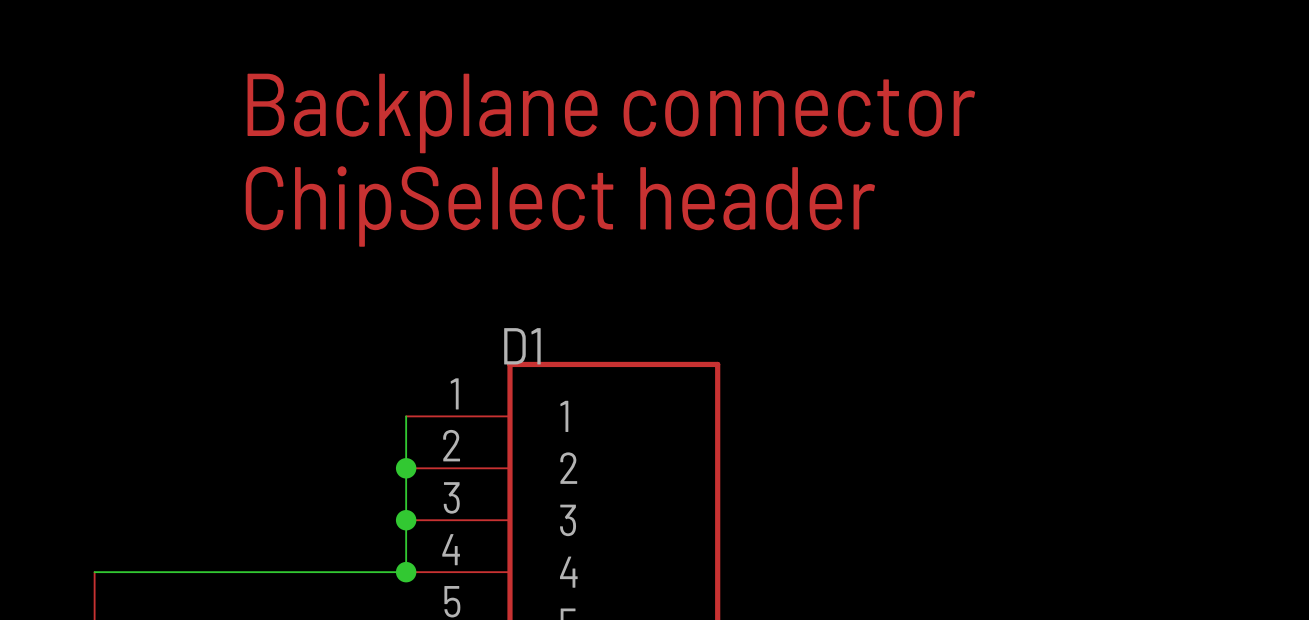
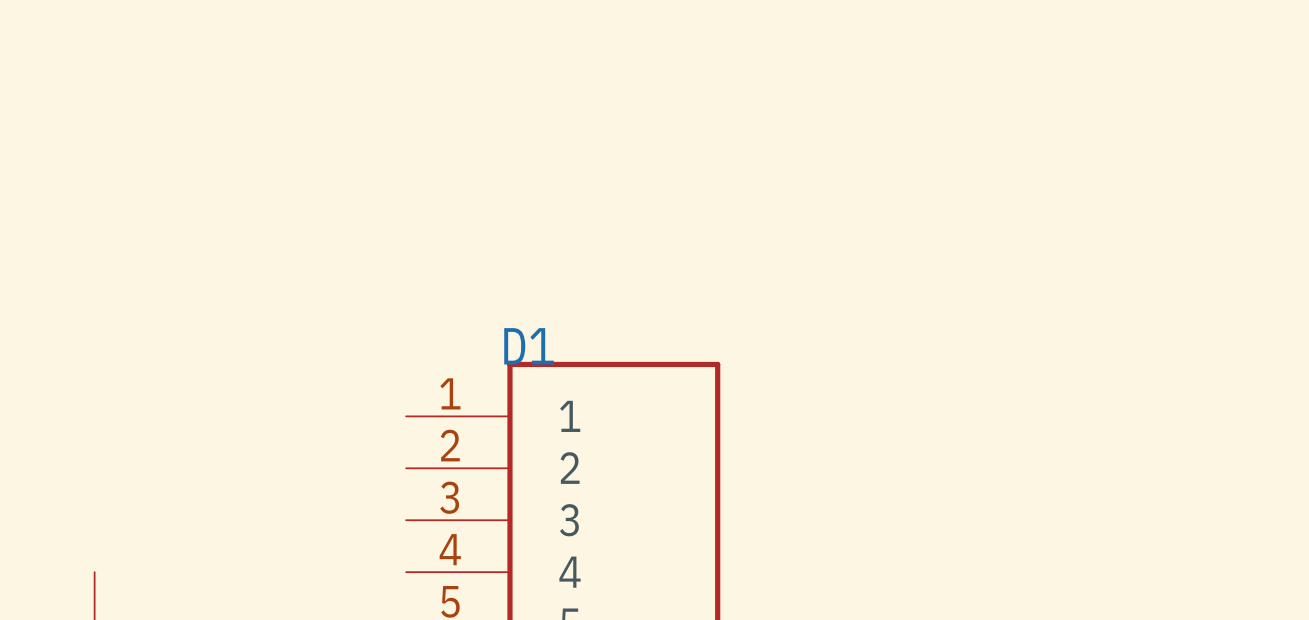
text: Backplane connector (611, 113) -> none
text: ChipSelect header (560, 206) -> none
wire: (406, 416) (406, 572) (94, 572) -> none
junction: (406, 468) -> none
junction: (406, 520) -> none
junction: (406, 572) -> none

